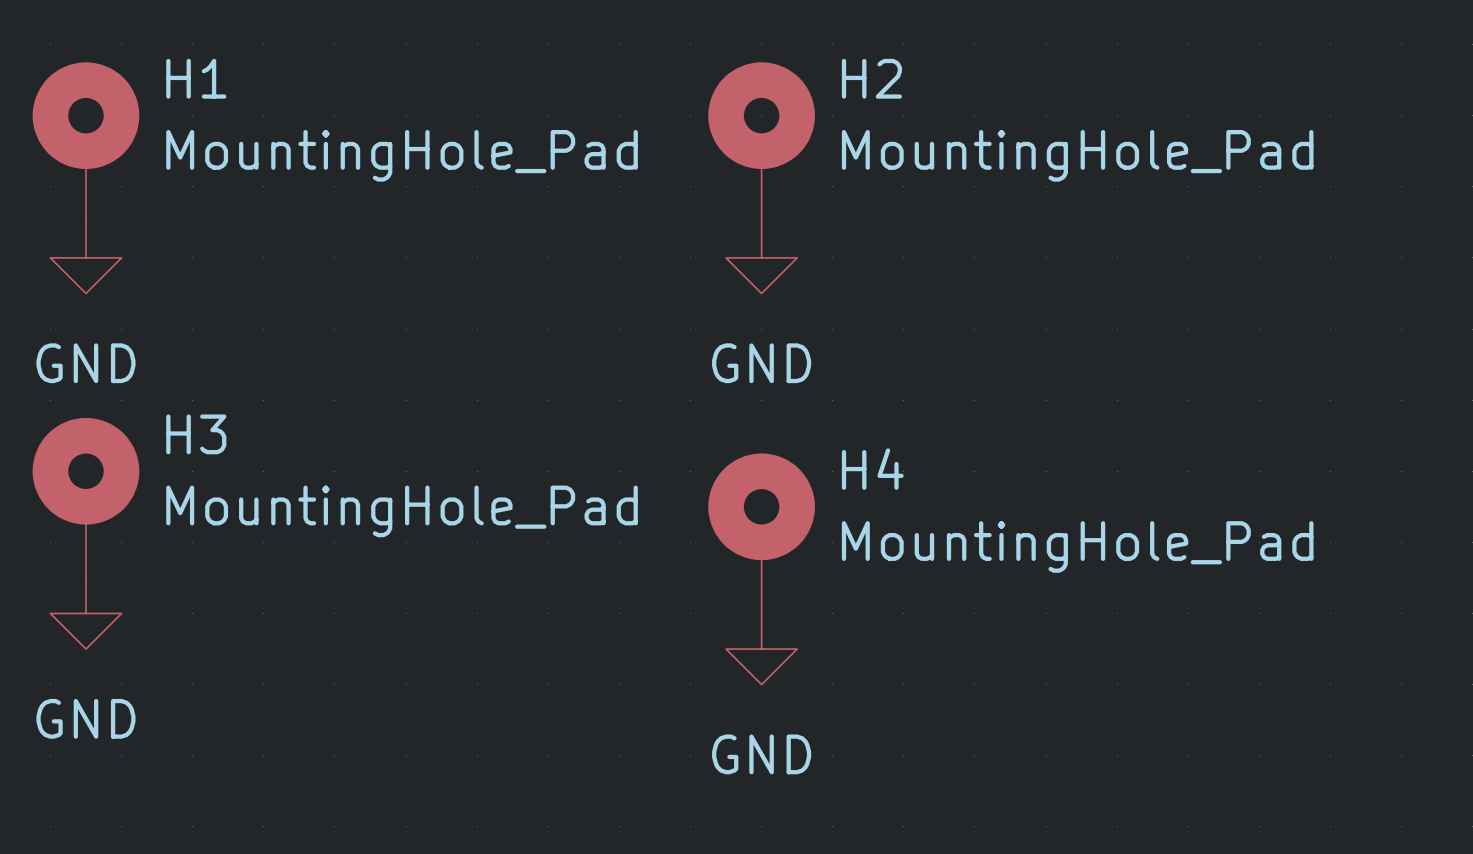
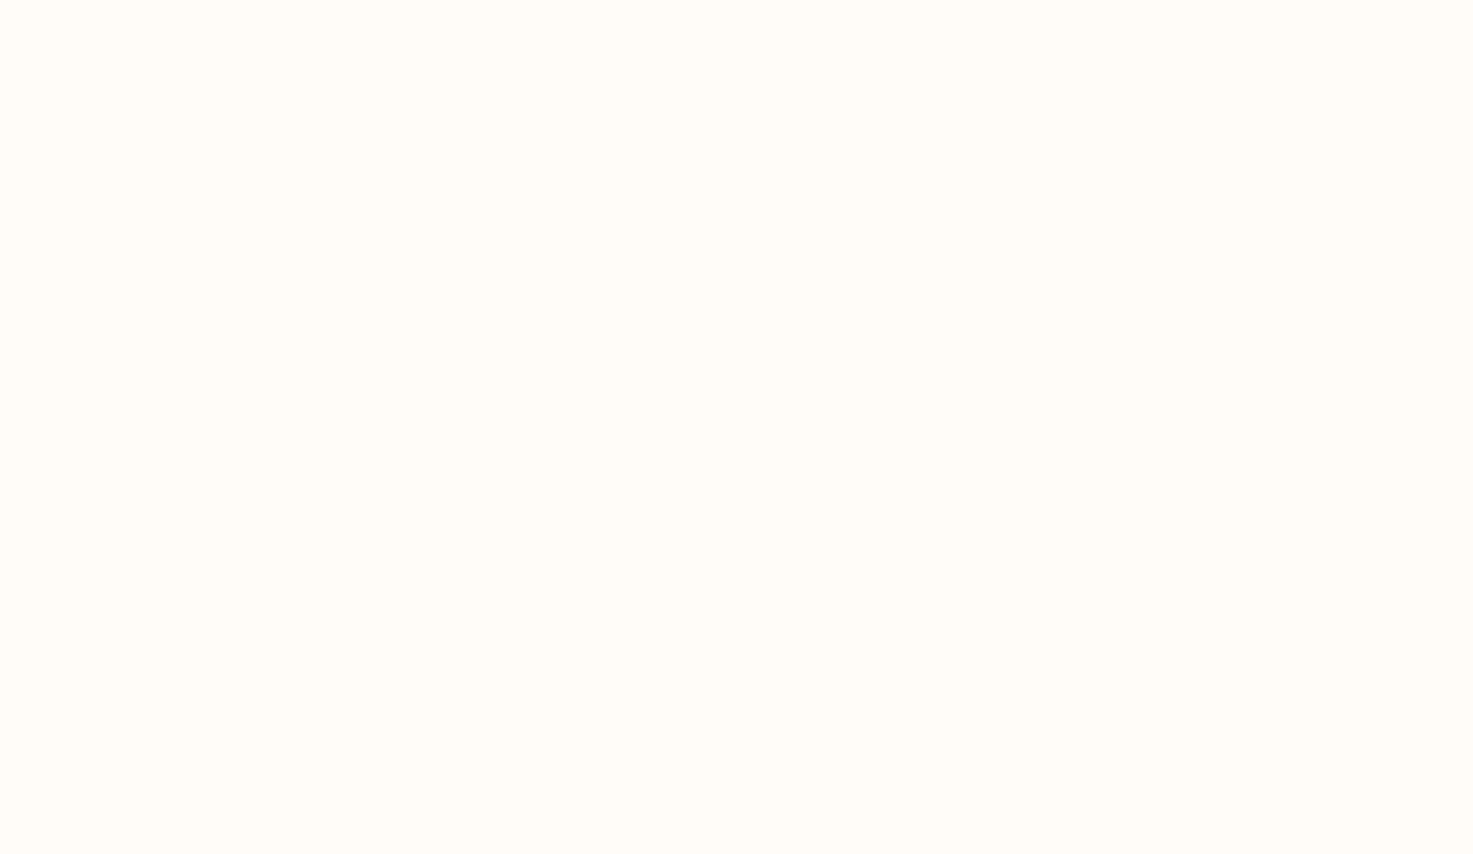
H1: MountingHole_Pad (85, 142) -> none
H2: MountingHole_Pad (761, 142) -> none
power symbol: GND (85, 257) -> none
power symbol: GND (761, 257) -> none
H3: MountingHole_Pad (85, 497) -> none
H4: MountingHole_Pad (761, 533) -> none
power symbol: GND (85, 613) -> none
power symbol: GND (761, 649) -> none

